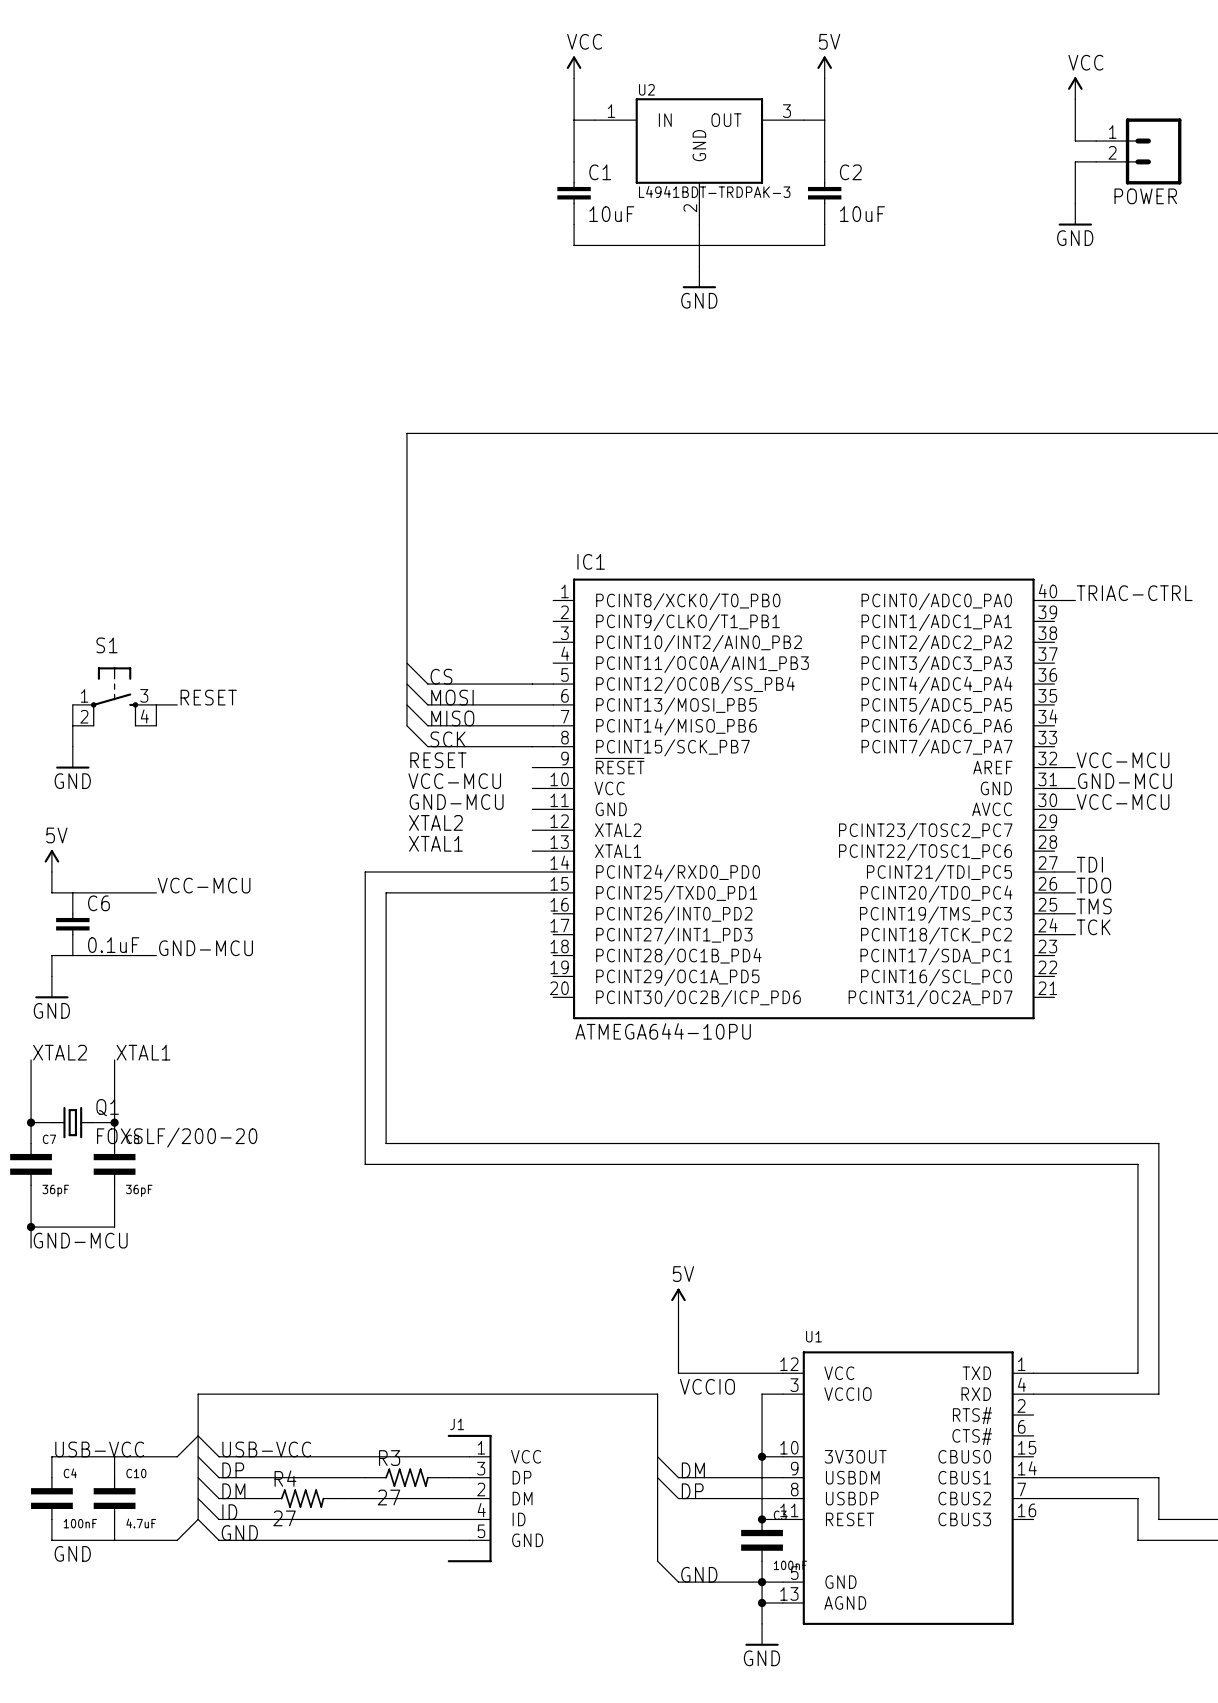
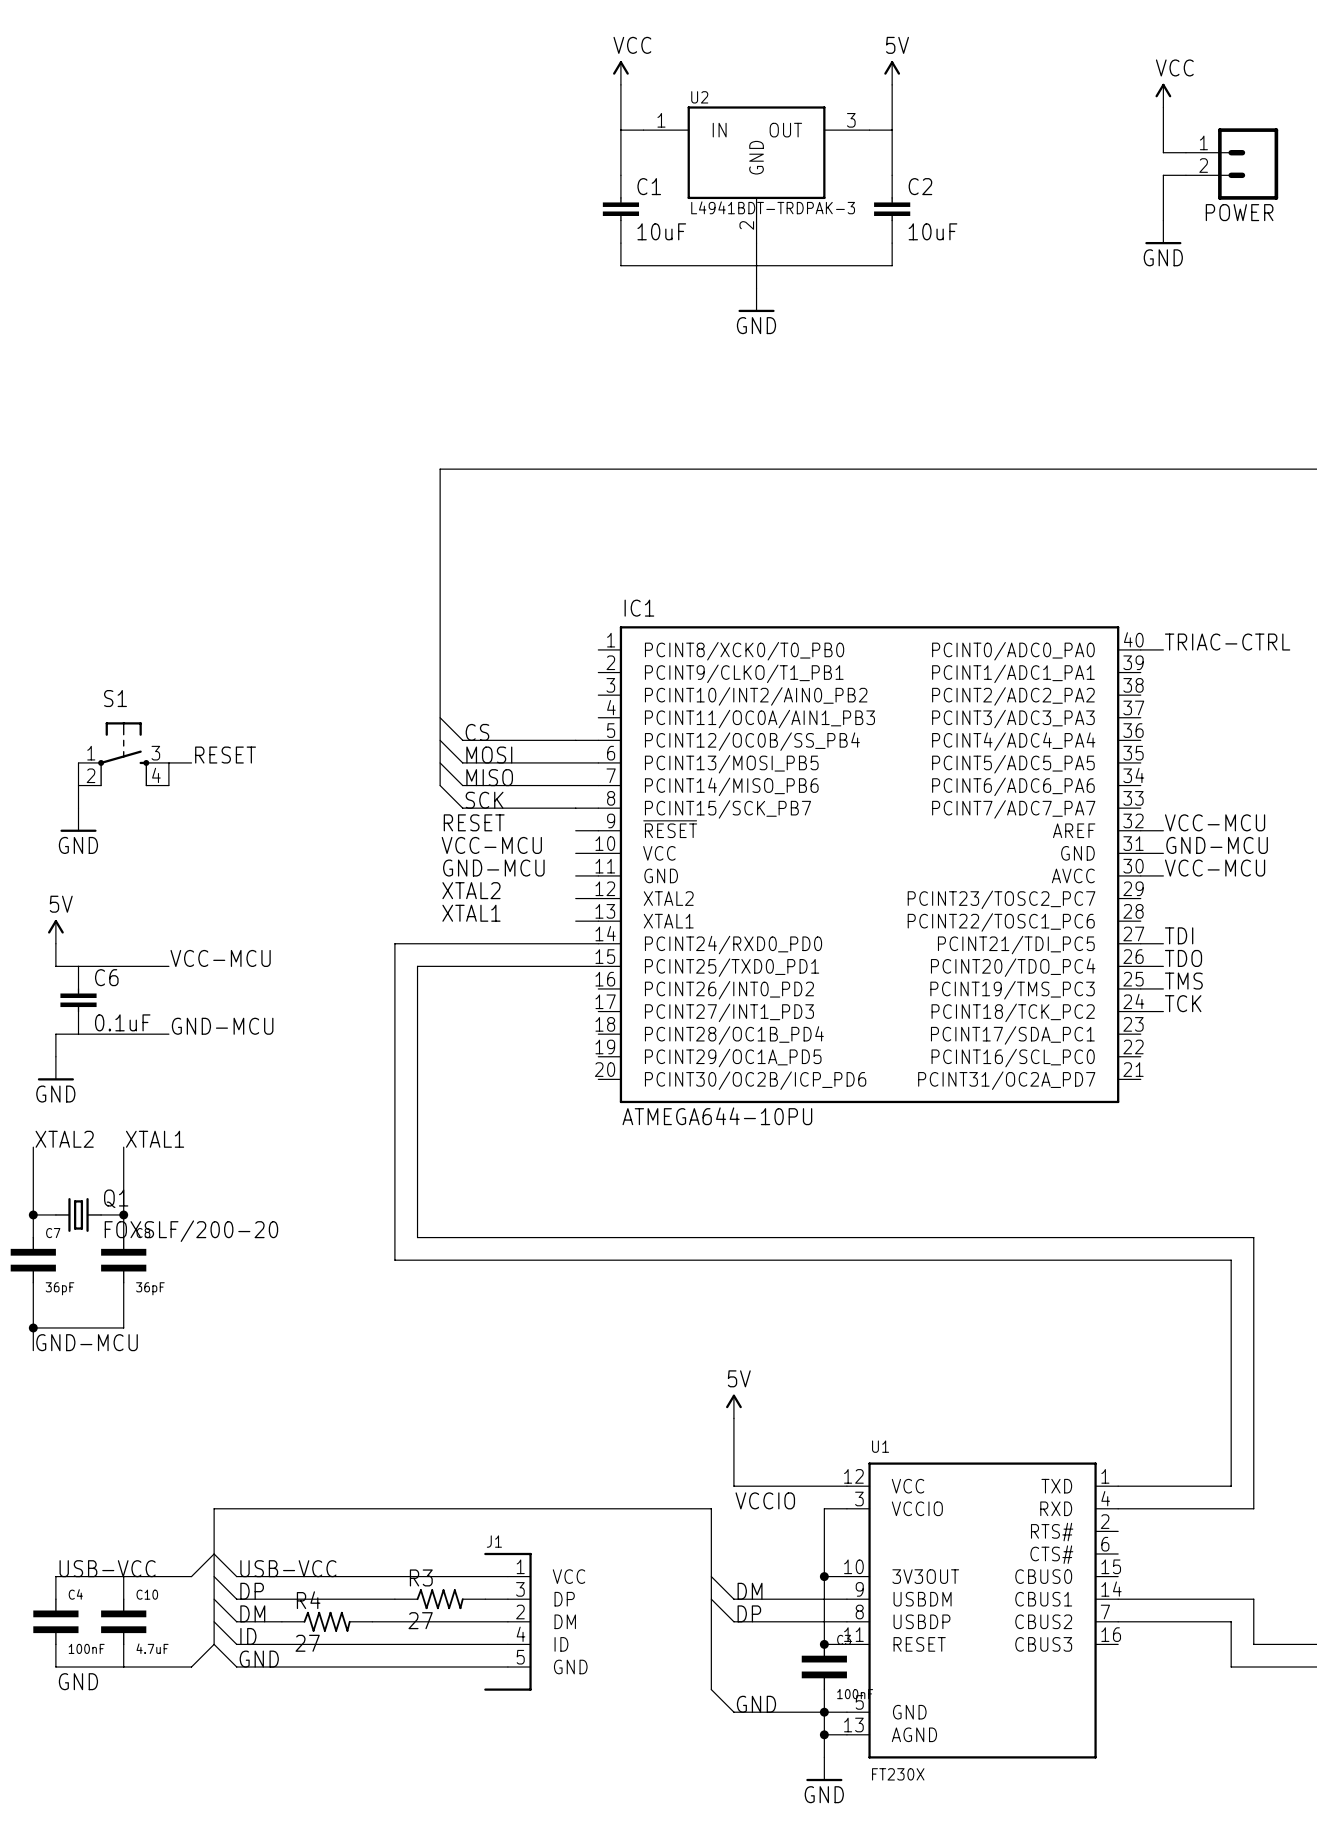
U1 value: none -> FT230X (898, 1774)

